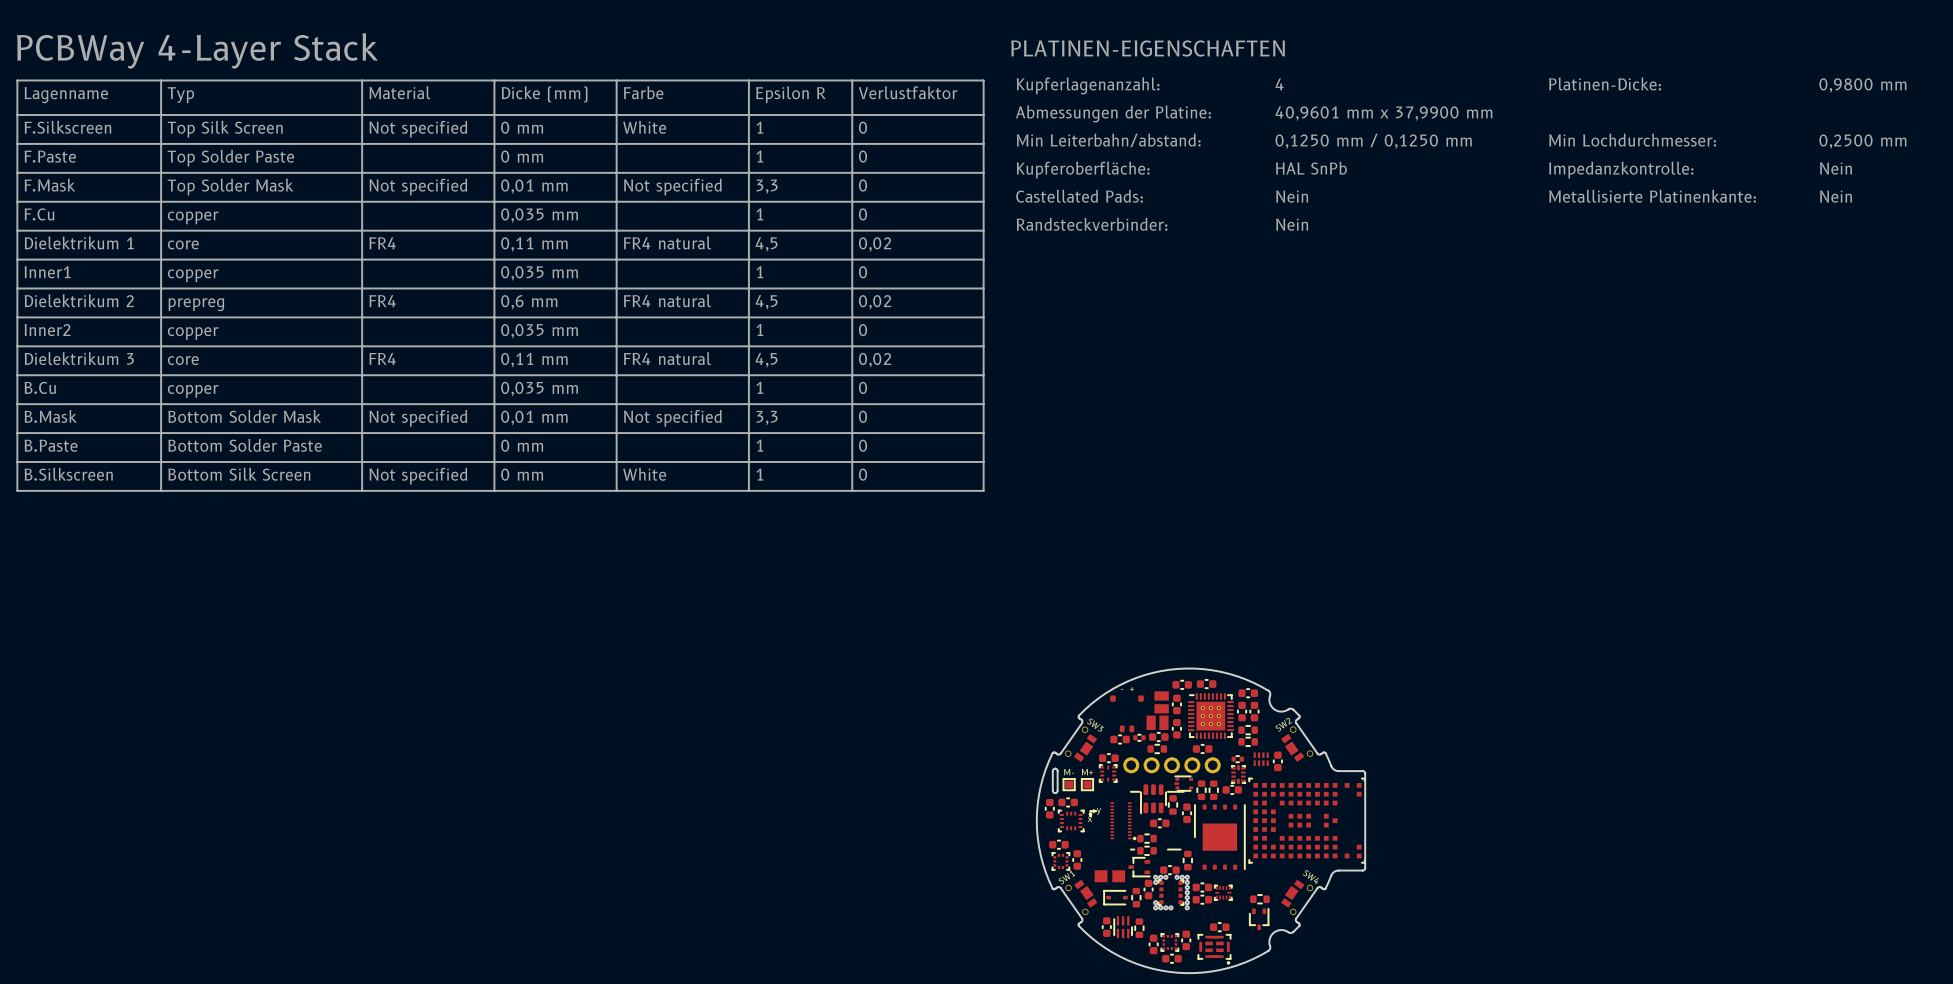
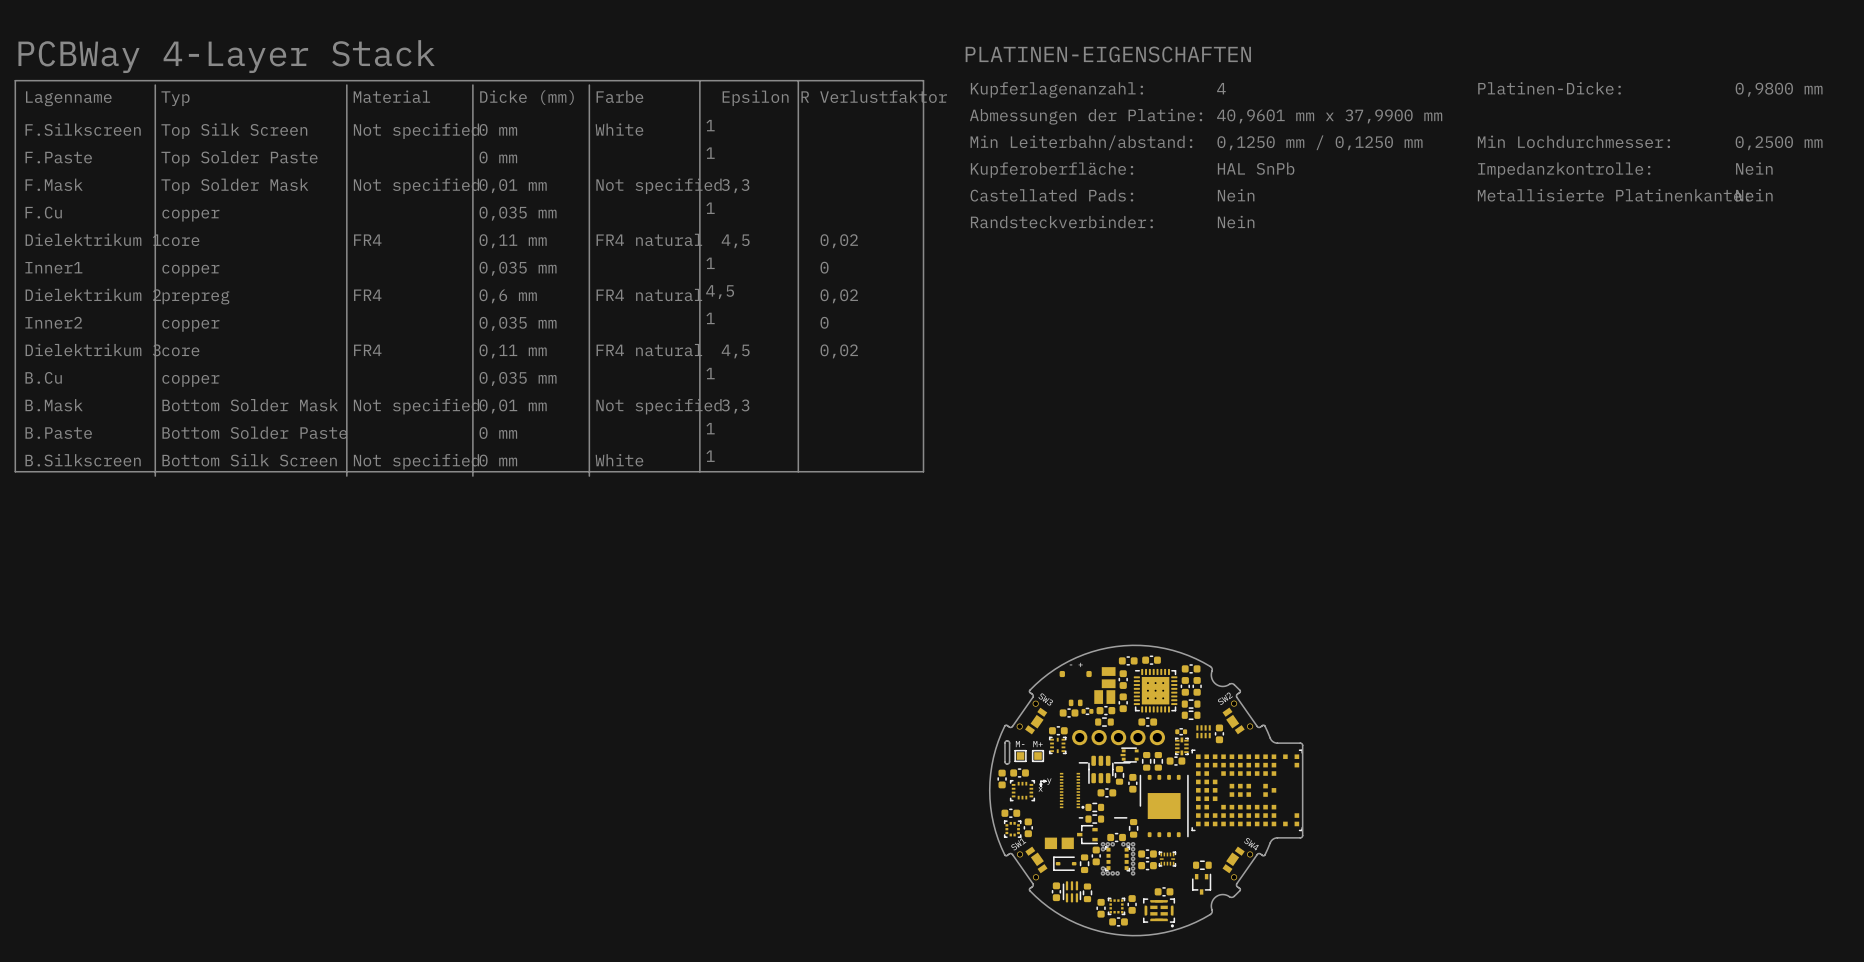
line: (17, 80) (17, 490) (983, 490) (983, 80) (17, 80) -> (15, 80) (15, 471) (923, 471) (923, 80) (15, 80)
line: (748, 80) (748, 490) -> (699, 80) (699, 471)
line: (852, 80) (852, 490) -> (798, 80) (798, 471)
line: (17, 115) (983, 115) -> none
text: none -> 1 (710, 125)
text: 1 (759, 127) -> none
text: 0 (863, 127) -> none
line: (17, 143) (983, 143) -> none
text: none -> 1 (710, 153)
text: 1 (759, 156) -> none
text: 0 (863, 156) -> none
line: (17, 172) (983, 172) -> none
text: 0 (863, 185) -> none
line: (17, 201) (983, 201) -> none
text position: 1 (759, 214) -> 1 (710, 208)
text: 0 (863, 214) -> none
line: (17, 230) (983, 230) -> none
line: (17, 259) (983, 259) -> none
text position: 1 (759, 272) -> 1 (710, 263)
line: (17, 288) (983, 288) -> none
text position: 4,5 (766, 302) -> 4,5 (720, 292)
line: (17, 317) (983, 317) -> none
text position: 1 (759, 330) -> 1 (710, 318)
line: (17, 346) (983, 346) -> none
line: (17, 375) (983, 375) -> none
text position: 1 (759, 387) -> 1 (710, 373)
text: 0 (863, 387) -> none
line: (17, 404) (983, 404) -> none
text: 0 (863, 416) -> none
line: (17, 433) (983, 433) -> none
text: none -> 1 (710, 428)
text: 1 (759, 445) -> none
text: 0 (863, 445) -> none
line: (17, 461) (983, 461) -> none
text: none -> 1 (710, 456)
text: 1 (759, 474) -> none
text: 0 (863, 474) -> none

